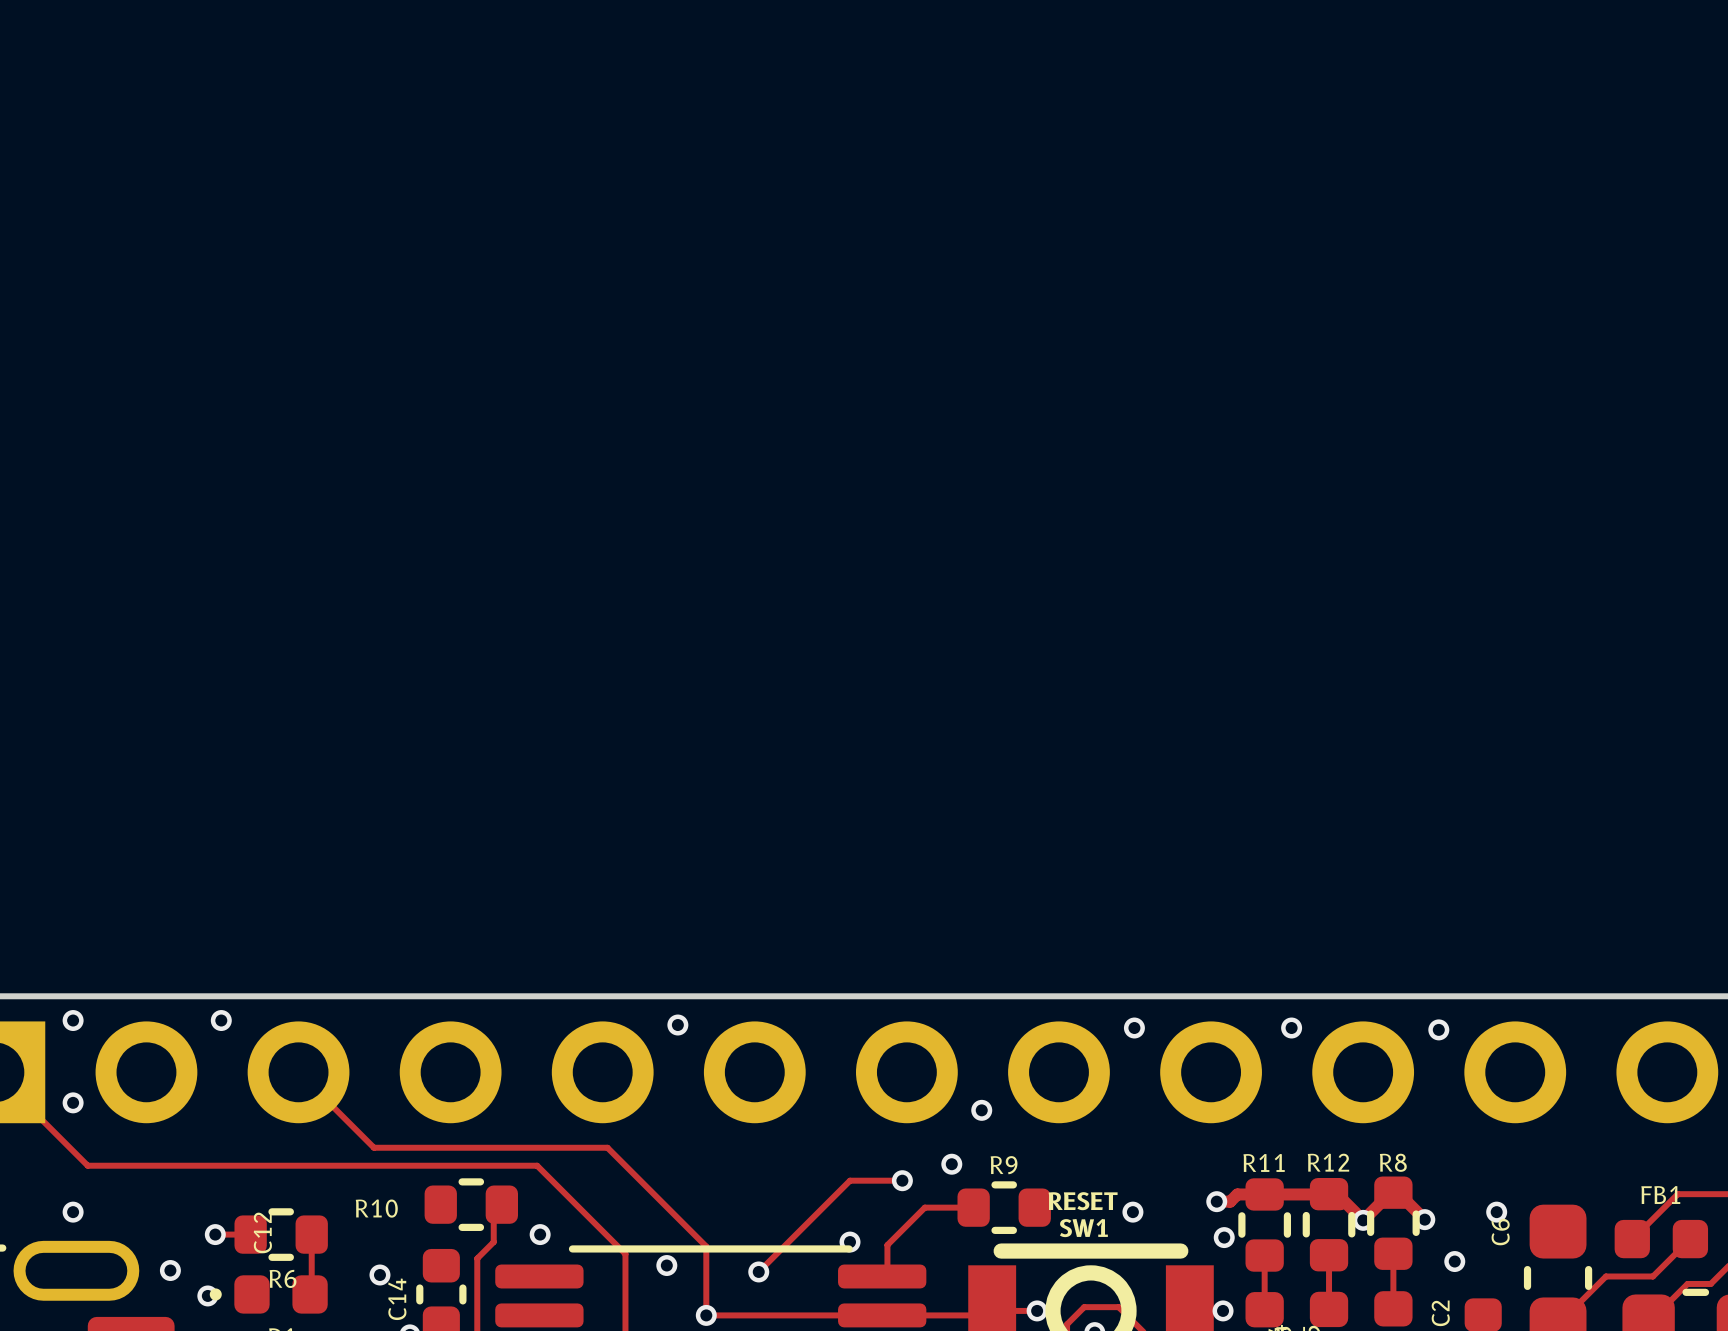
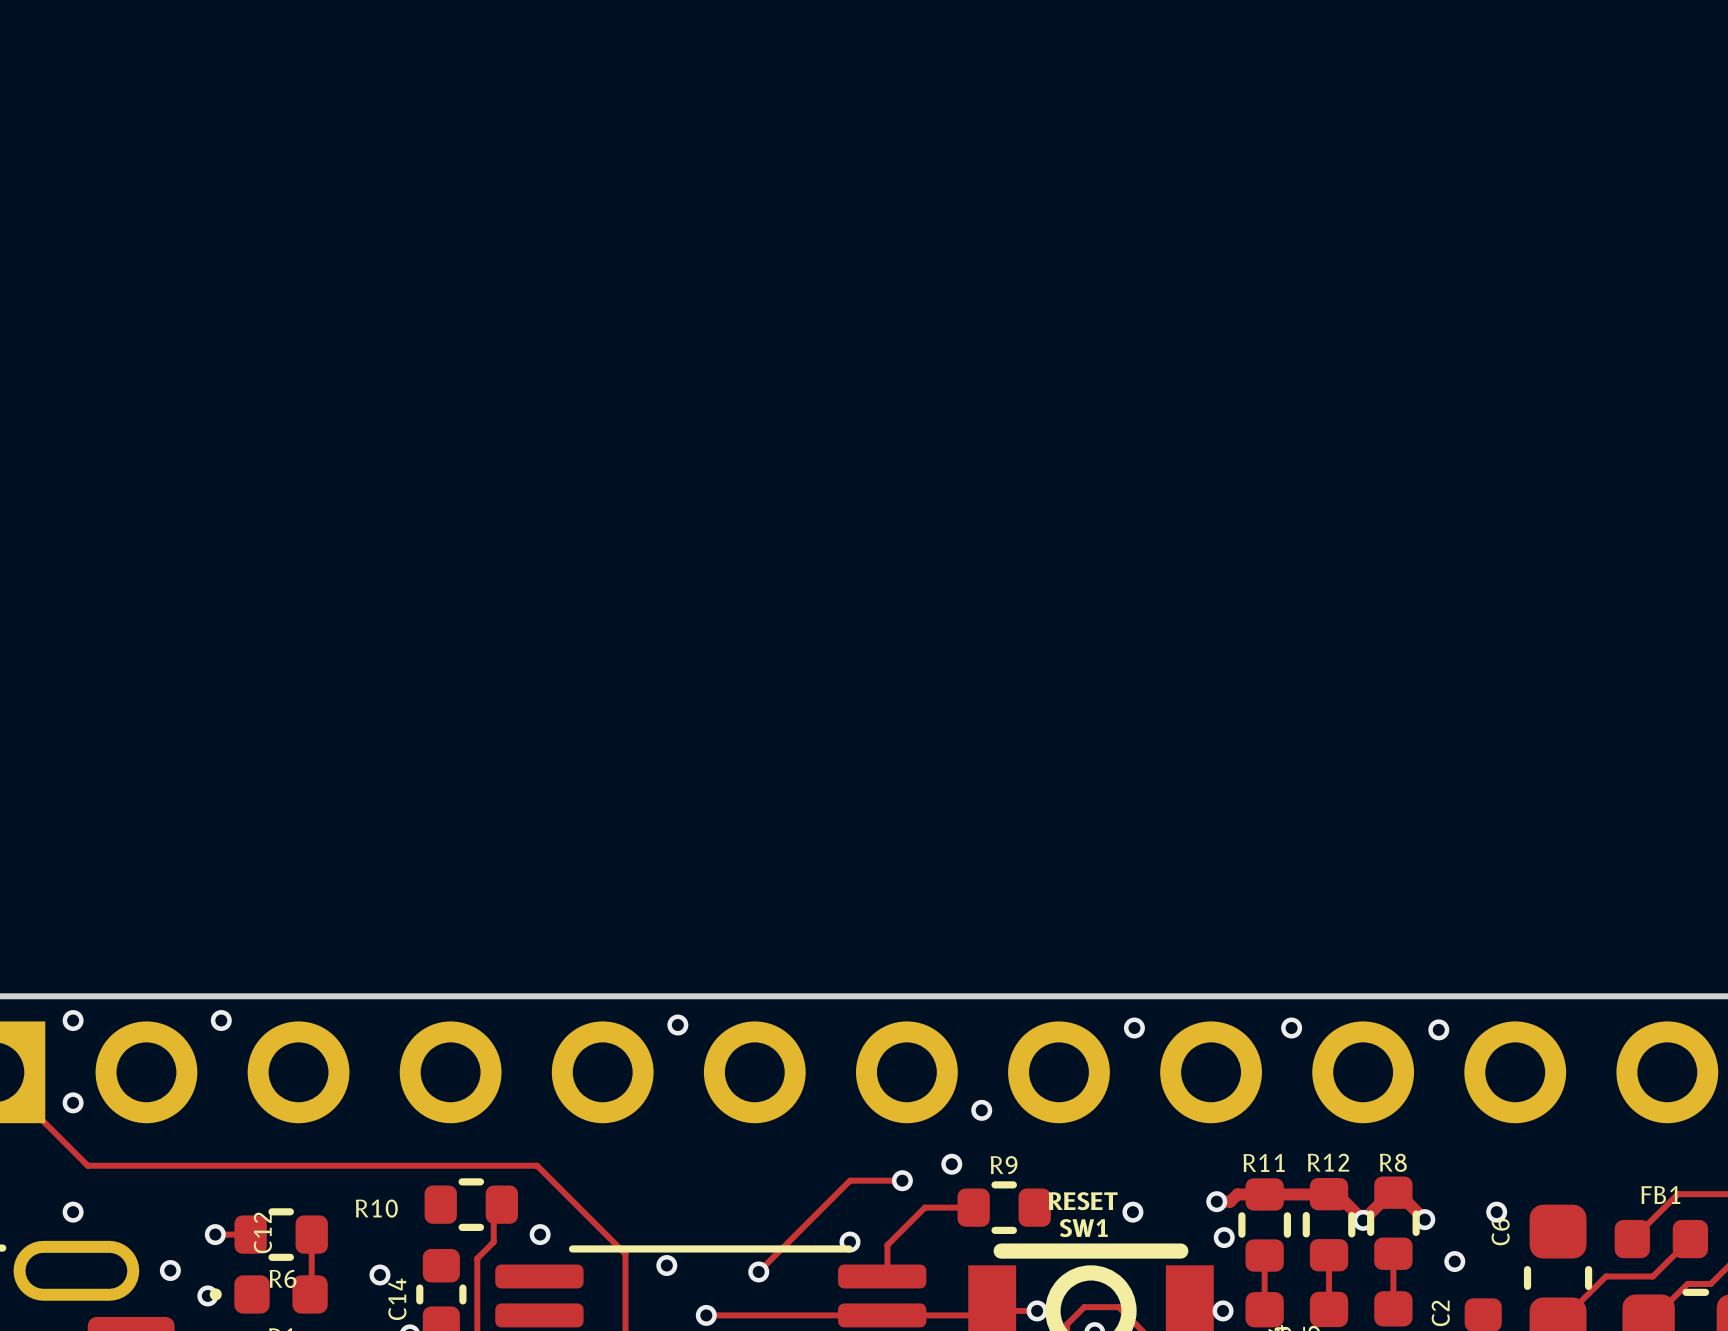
track: (298, 1072) (373, 1147) (607, 1147) (706, 1246) (706, 1315) -> none

